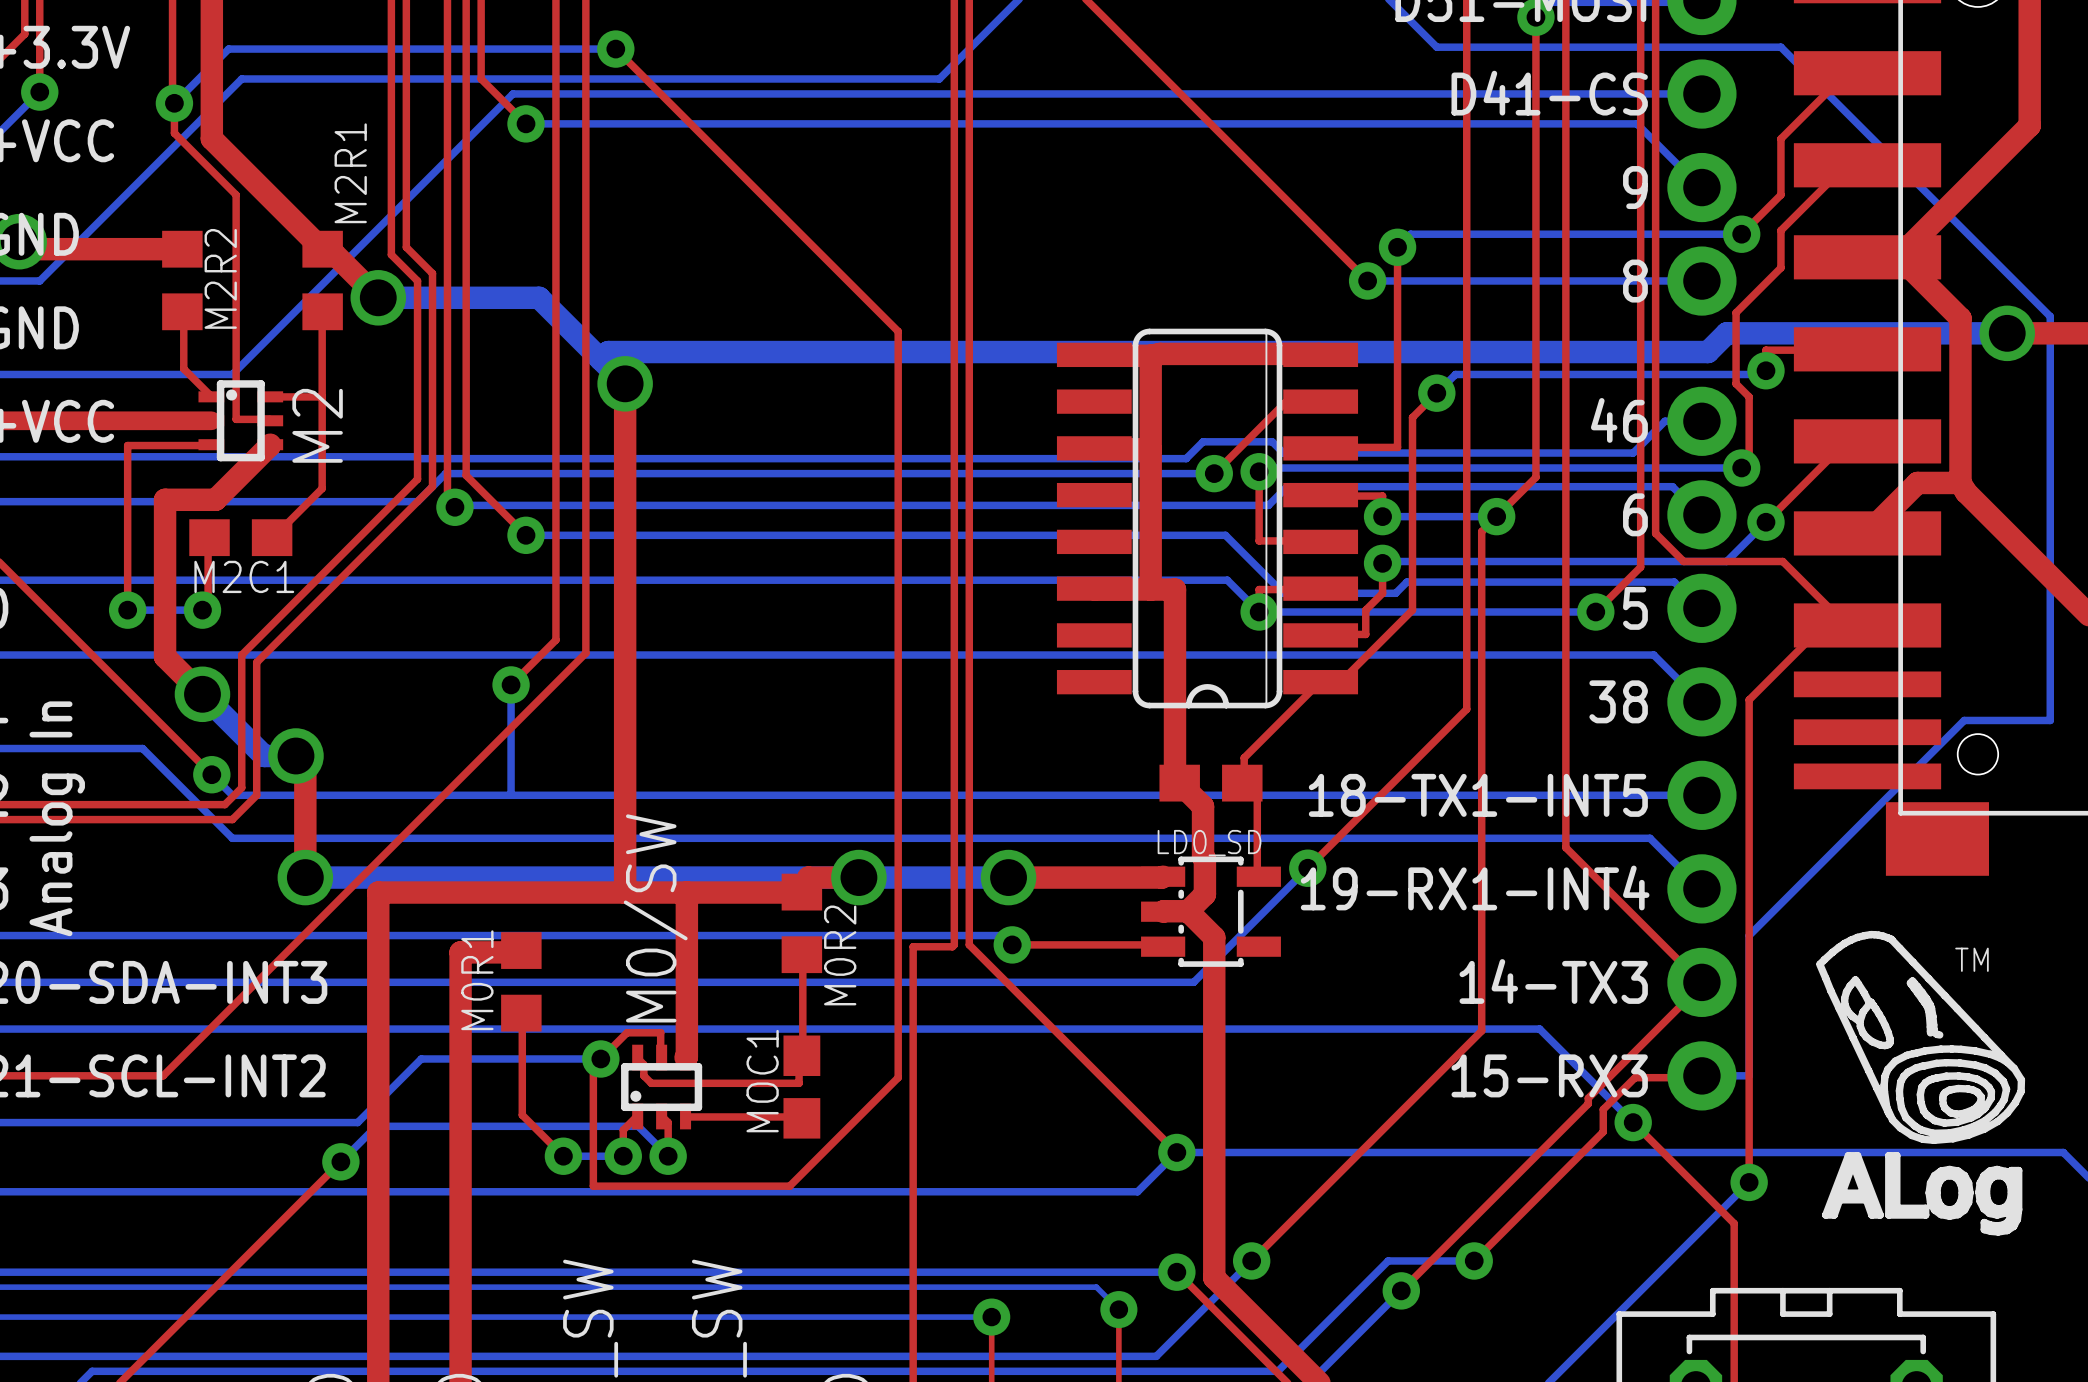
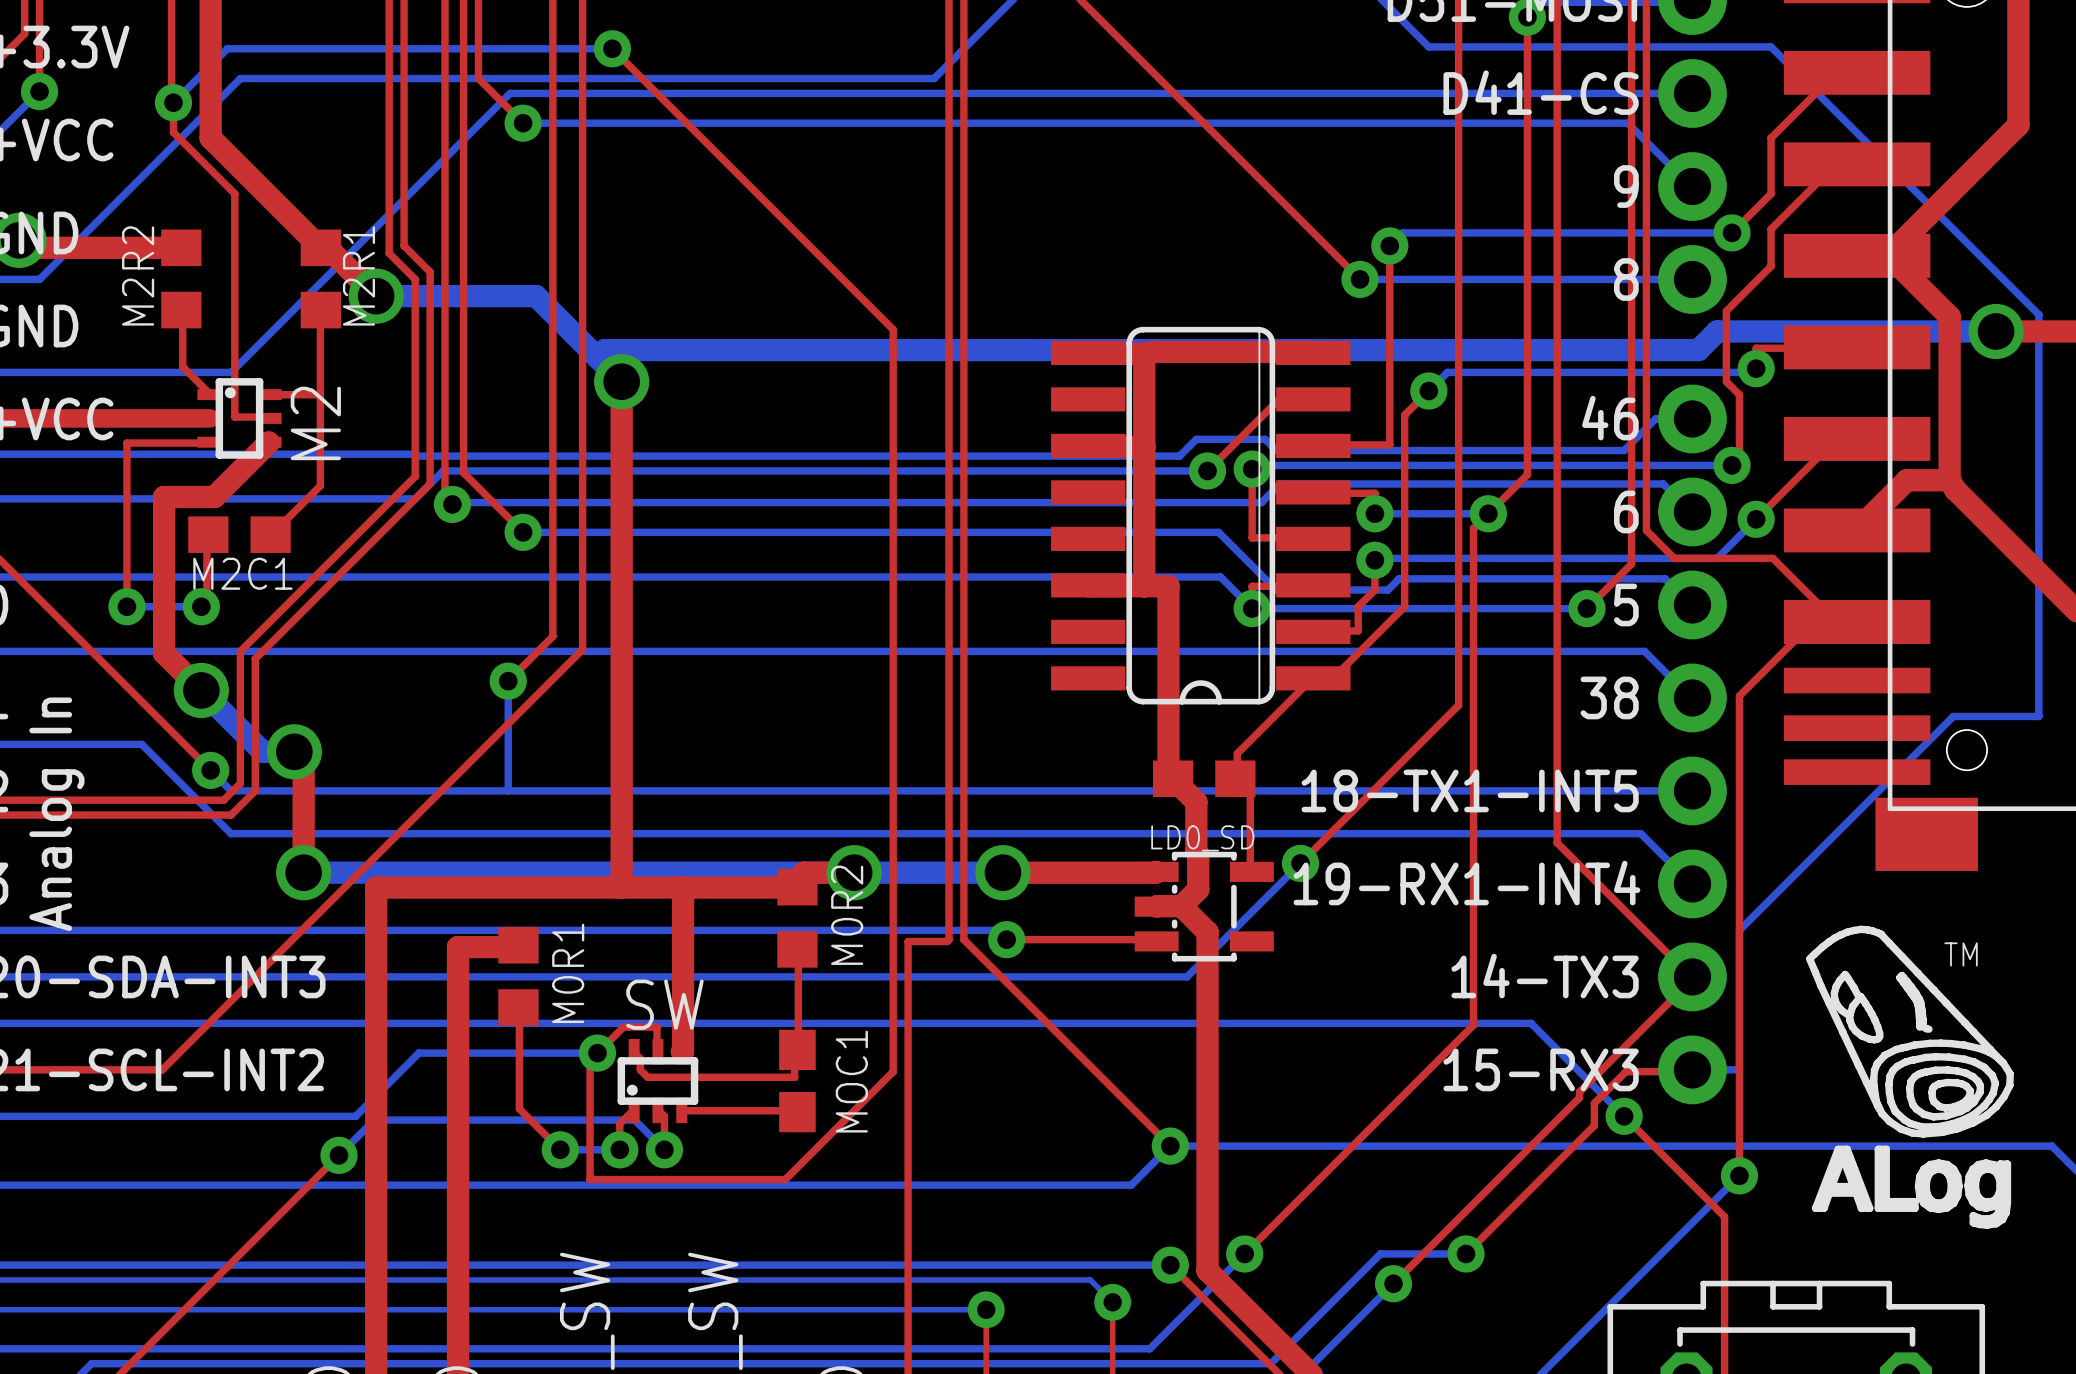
M2R1 name position: M2R1 (350, 173) -> M2R1 (358, 275)
M2R2 name position: M2R2 (220, 278) -> M2R2 (138, 275)
M0/SW name: M0/SW (655, 918) -> SW (664, 1004)
M0R2 name position: M0R2 (840, 955) -> M0R2 (847, 915)
M0R1 name position: M0R1 (477, 980) -> M0R1 (568, 973)
MOC1 name position: MOC1 (762, 1081) -> MOC1 (851, 1081)

